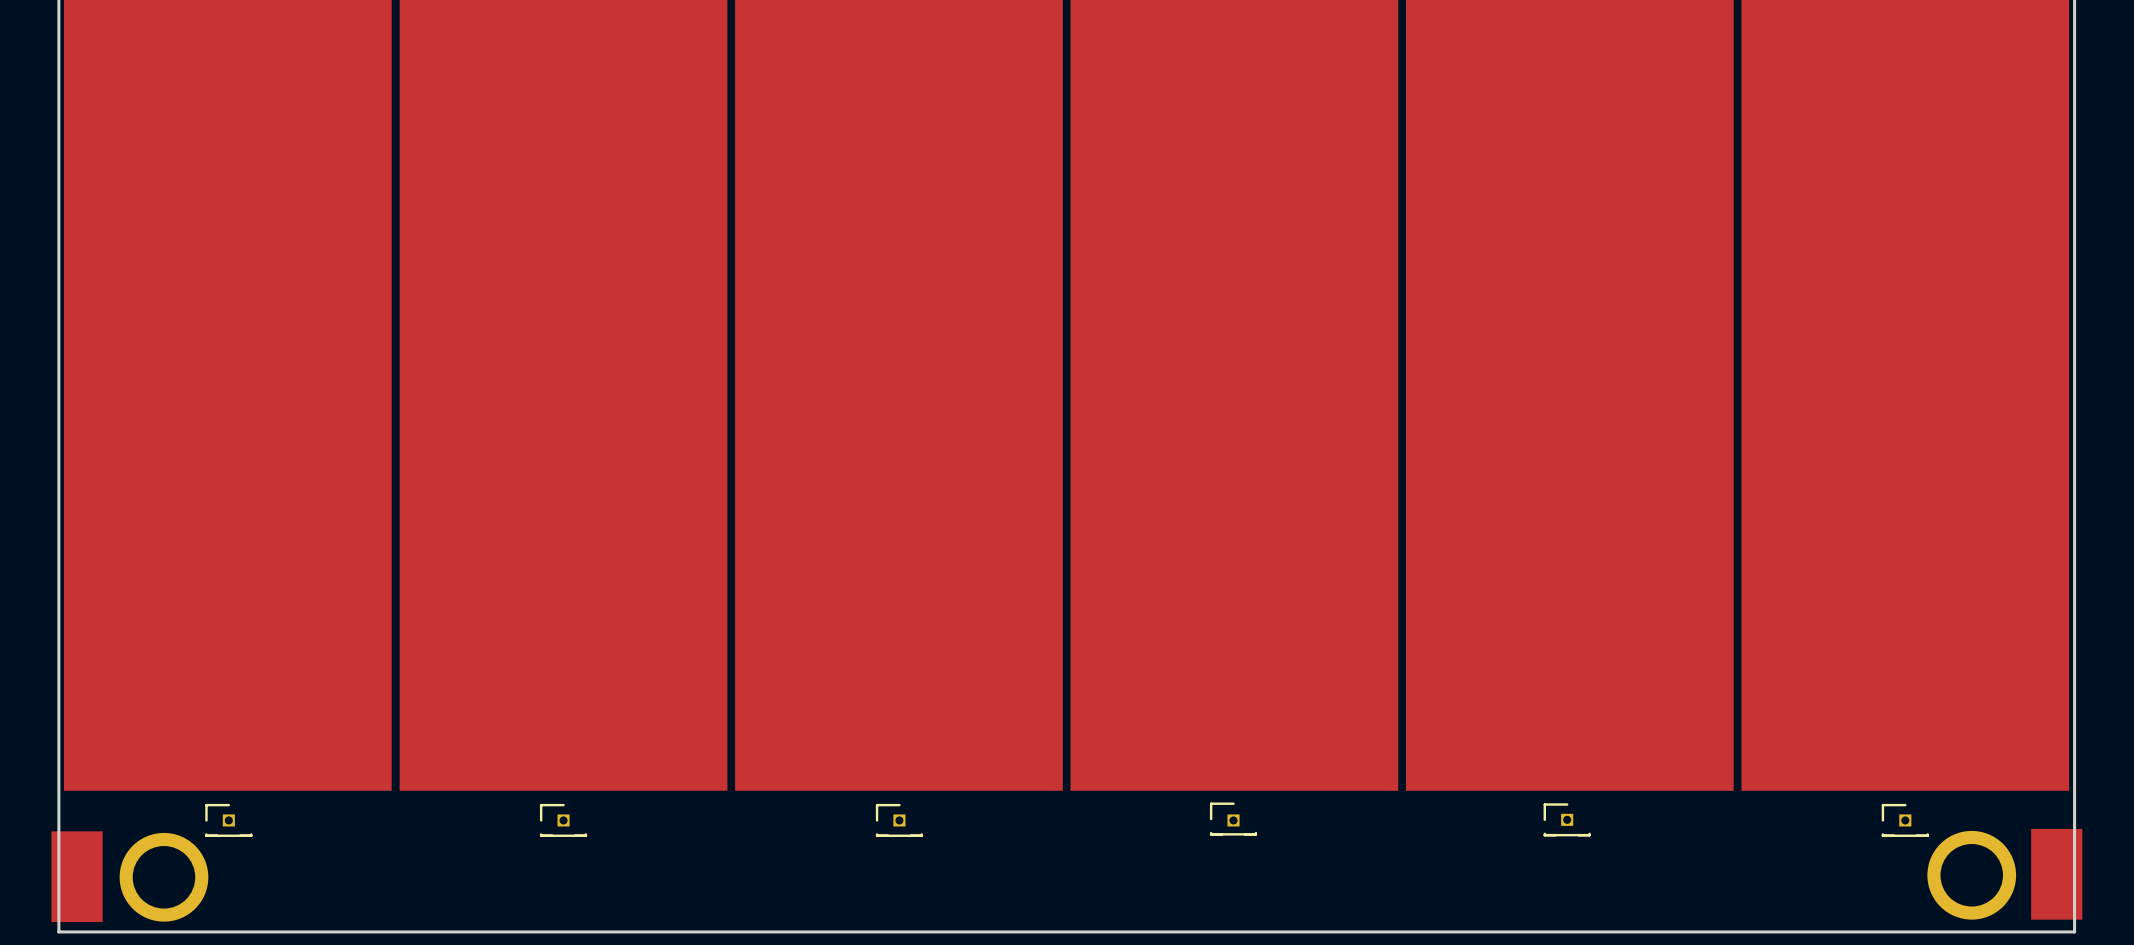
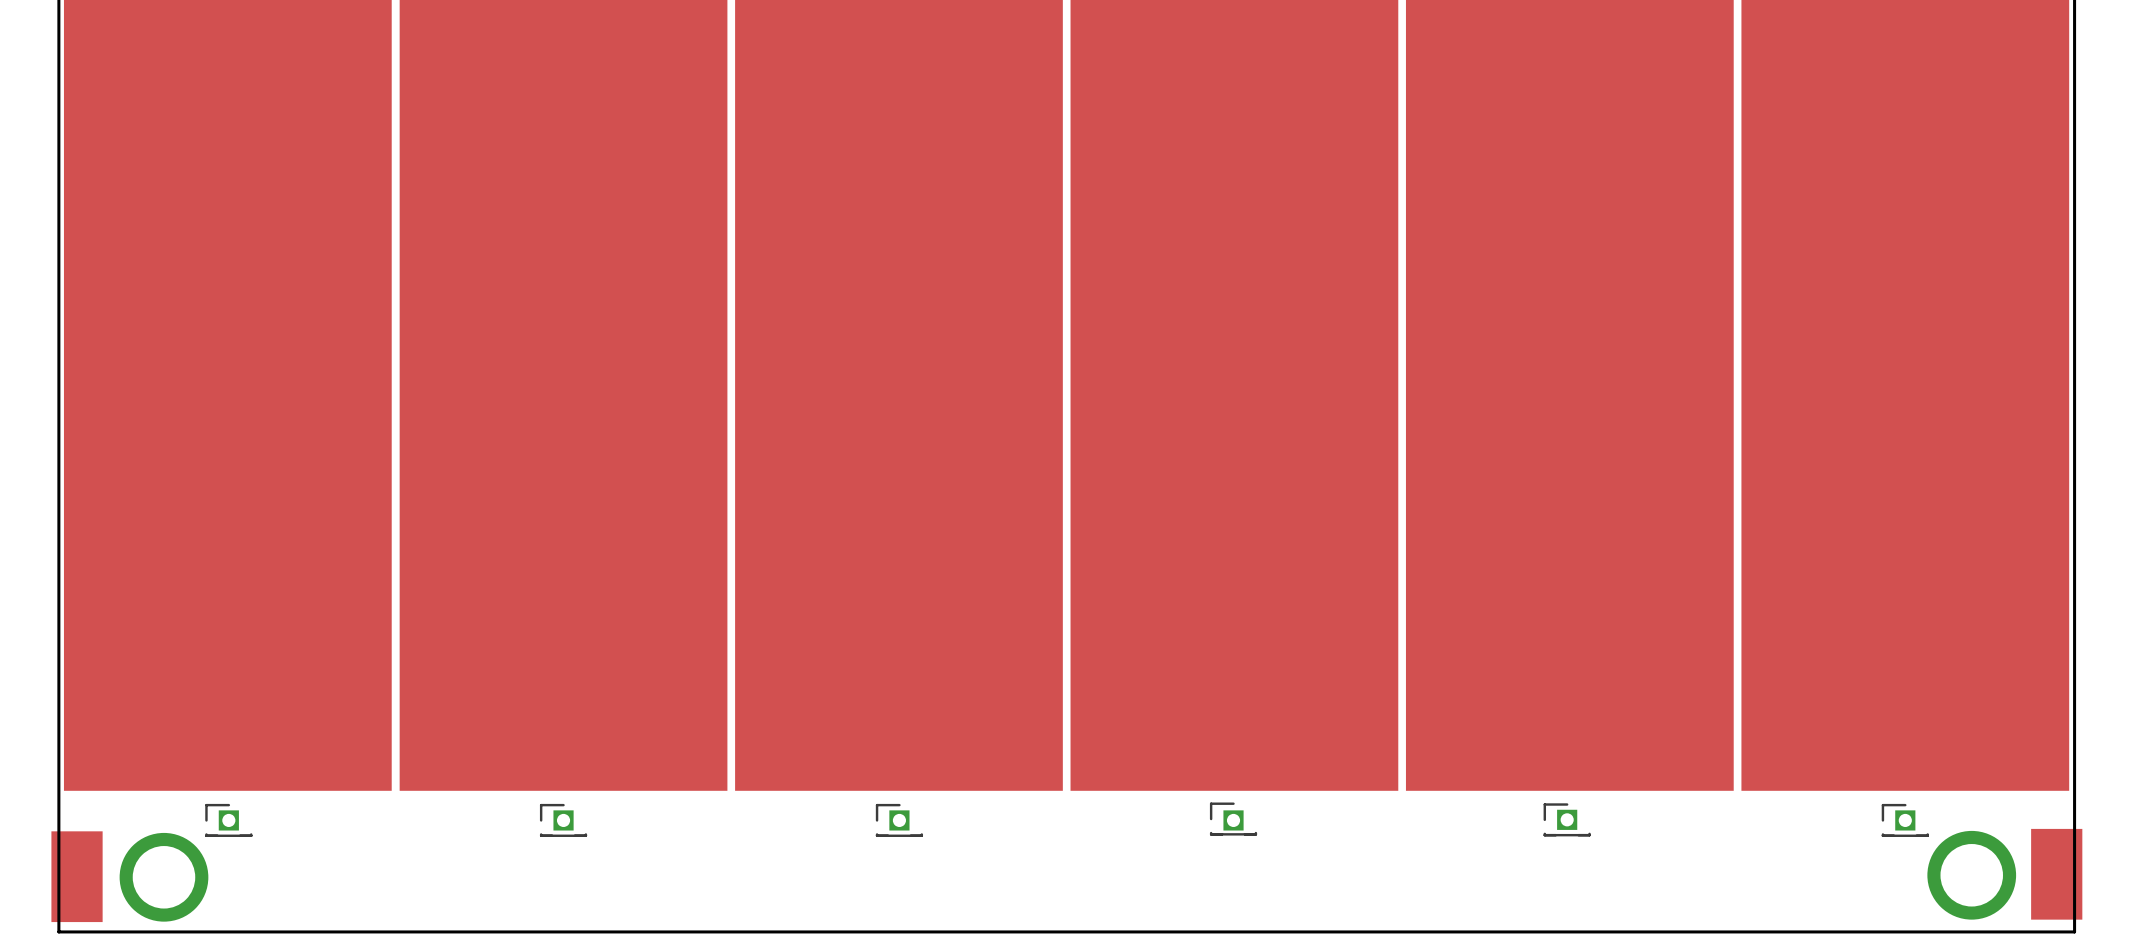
part footprint: [1209, 802, 1258, 836] -> [1209, 802, 1258, 836]
part footprint: [205, 803, 253, 837] -> [205, 803, 253, 837]
part footprint: [539, 803, 588, 837] -> [539, 803, 588, 837]
part footprint: [875, 803, 924, 837] -> [875, 803, 924, 837]
part footprint: [1543, 803, 1591, 837] -> [1543, 803, 1591, 837]
part footprint: [1881, 803, 1929, 837] -> [1881, 803, 1929, 837]

